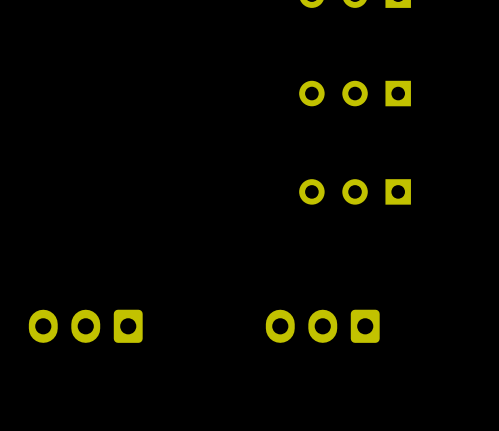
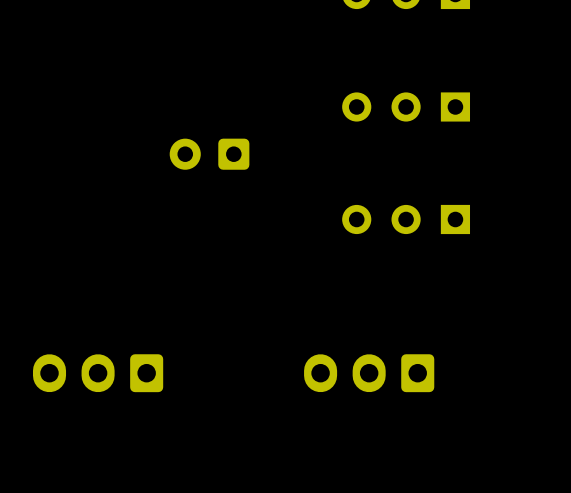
part: none -> (209, 154)

